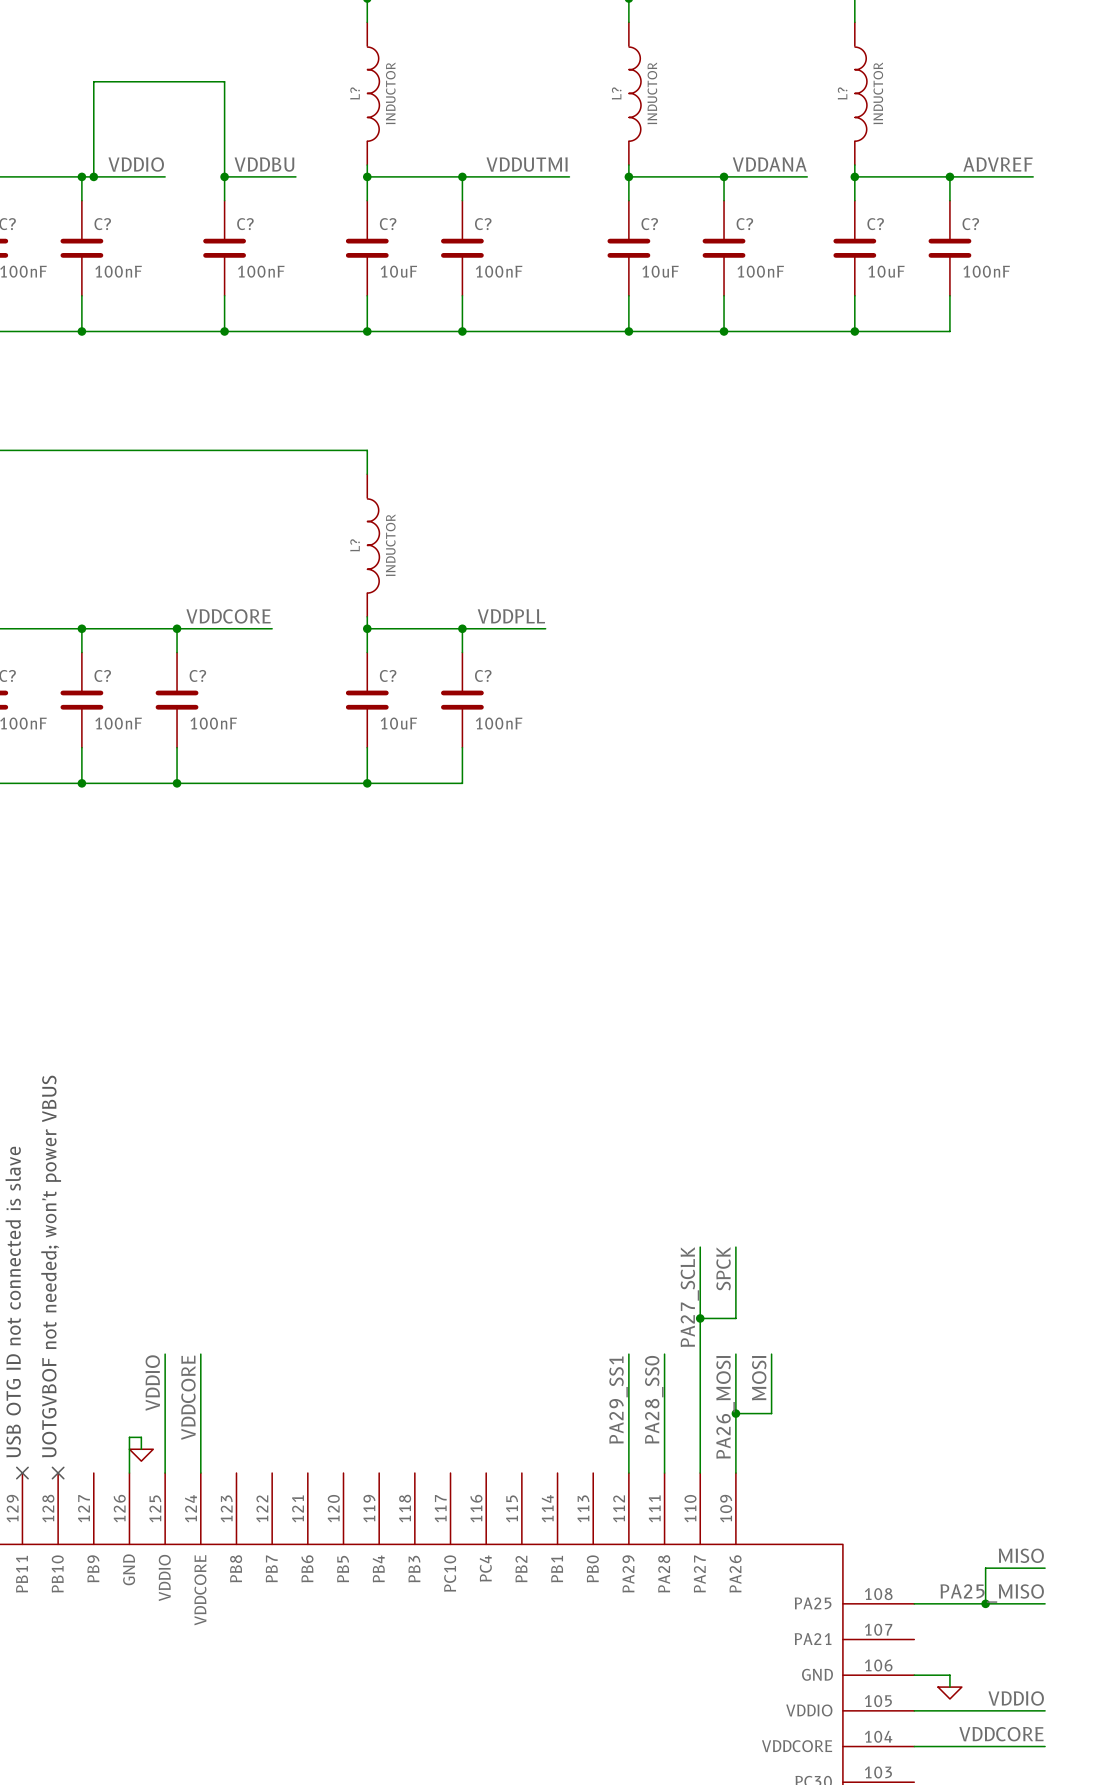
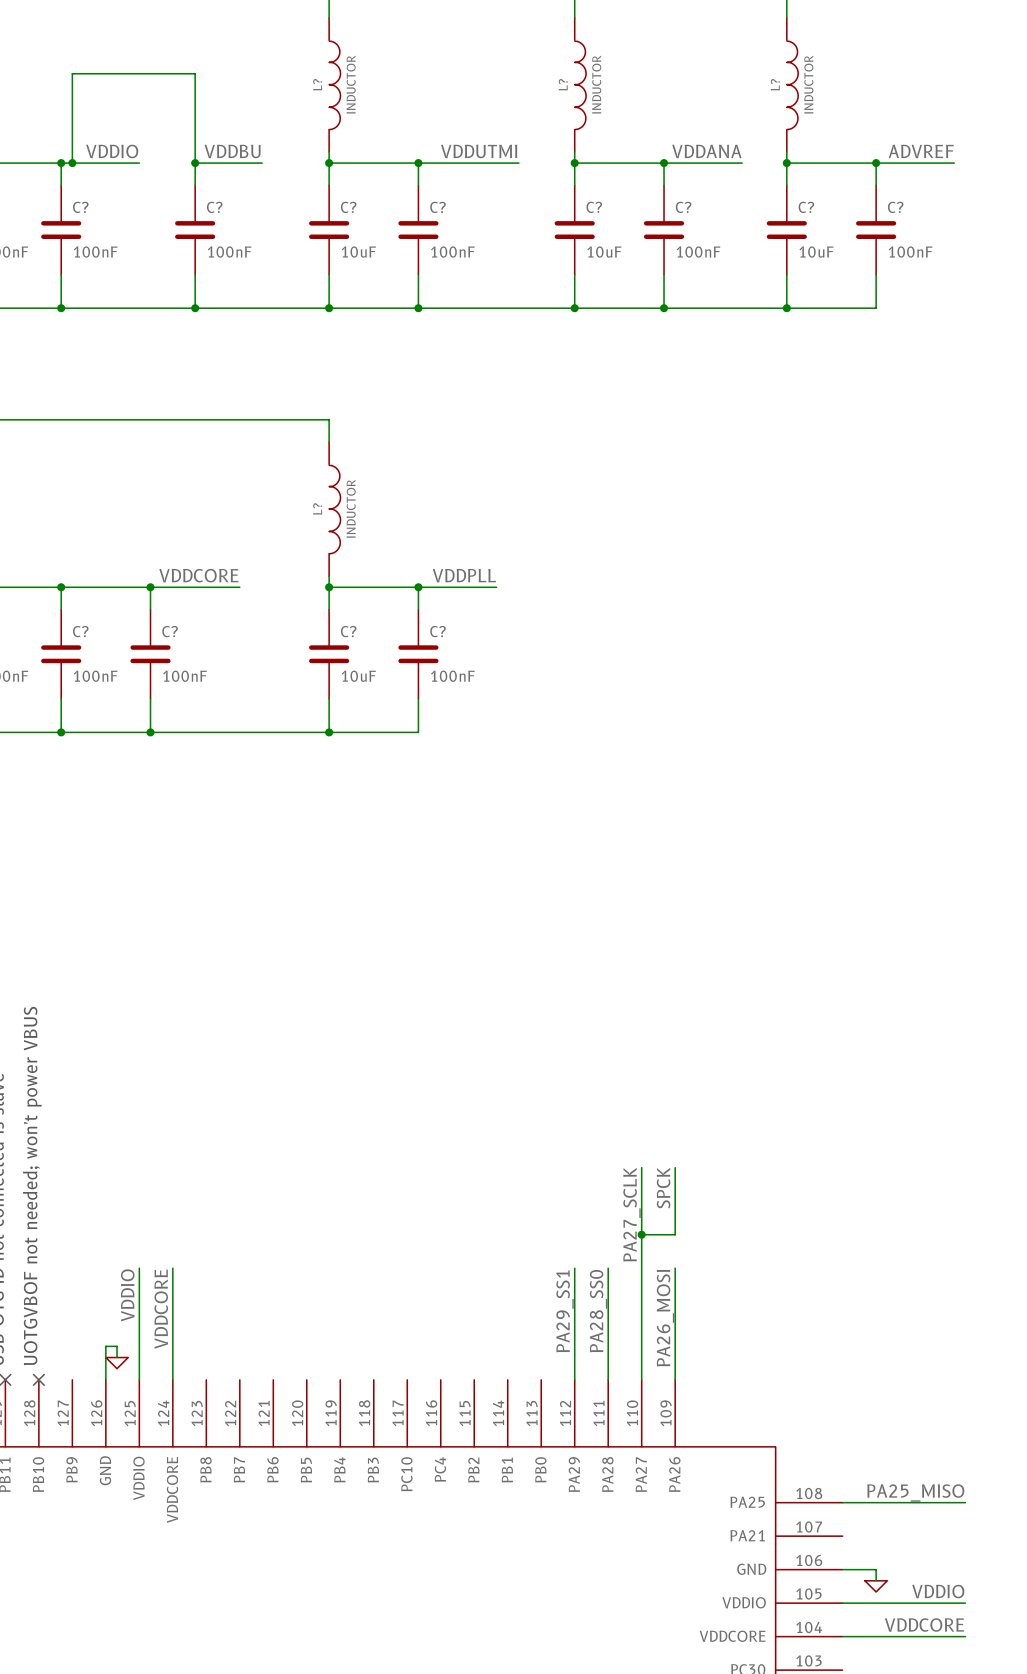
wire: (771, 1354) (771, 1413) (735, 1413) -> none
label: MOSI (759, 1378) -> none
junction: (735, 1413) -> none
label: MISO (1021, 1555) -> none
wire: (1045, 1568) (985, 1568) (985, 1603) -> none
junction: (985, 1603) -> none

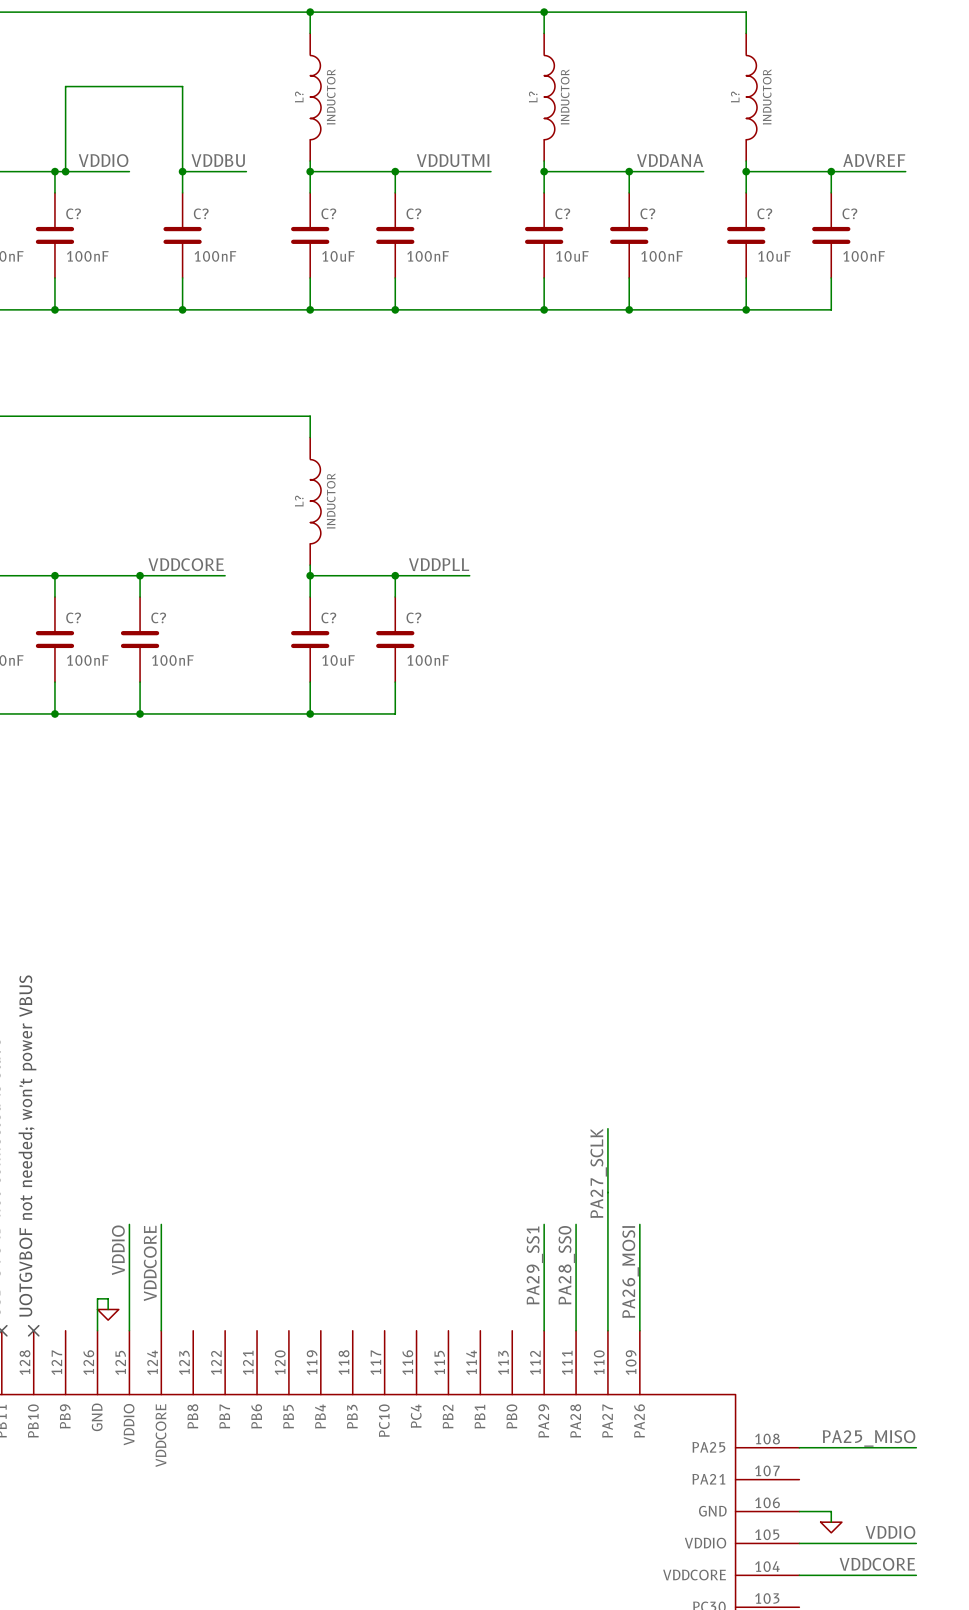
wire: (675, 1167) (675, 1234) (641, 1234) -> none
label: SPCK (663, 1188) -> none
junction: (641, 1234) -> none

